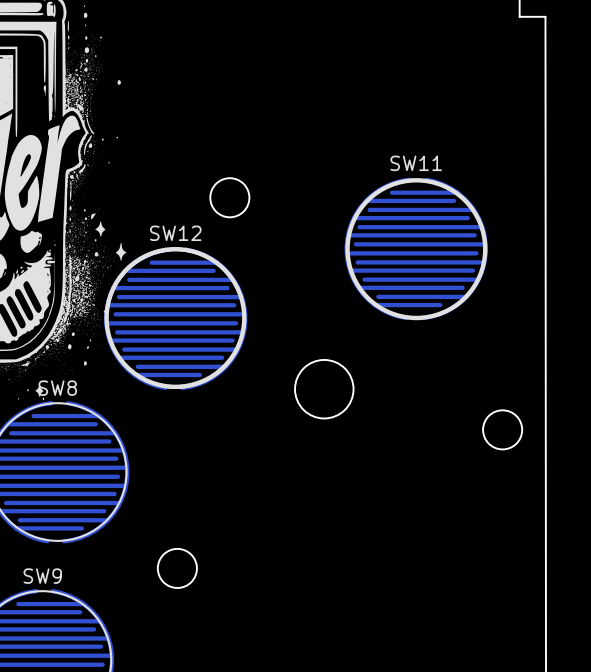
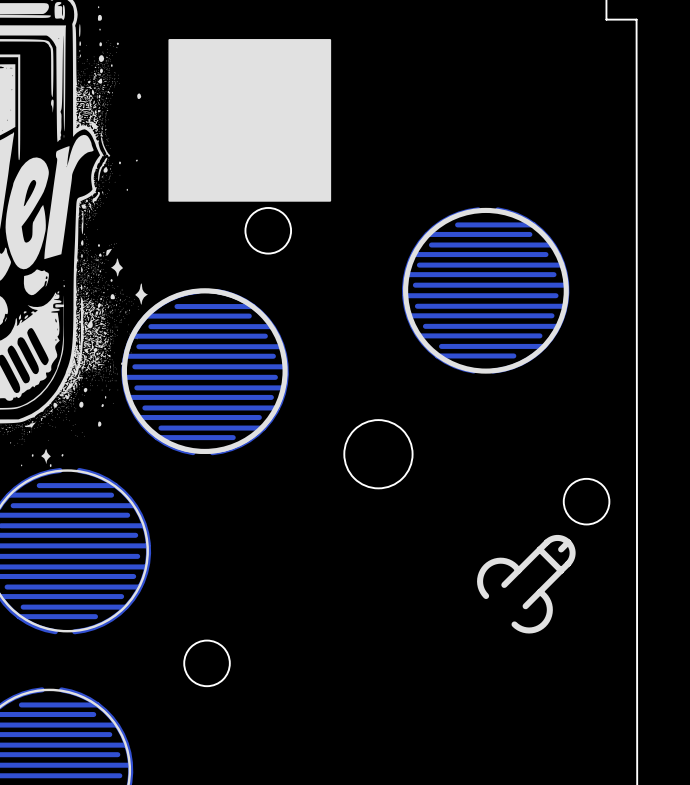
drawing: none -> [168, 39, 332, 202]
SW11 name: SW11 (416, 163) -> none
SW12 name: SW12 (175, 233) -> none
SW8 name: SW8 (57, 388) -> none
line: none -> (568, 542) (561, 549)
line: none -> (539, 549) (561, 570)
line: none -> (518, 570) (513, 564) (505, 561) (495, 561) (488, 565) (482, 571) (480, 578) (480, 586) (486, 596)
line: none -> (504, 584) (549, 540) (560, 538) (568, 542) (572, 552) (570, 560) (525, 606)
line: none -> (539, 592) (545, 597) (549, 604) (549, 612) (545, 622) (539, 627) (531, 630) (521, 628) (514, 624)
SW9 name: SW9 (42, 576) -> none

